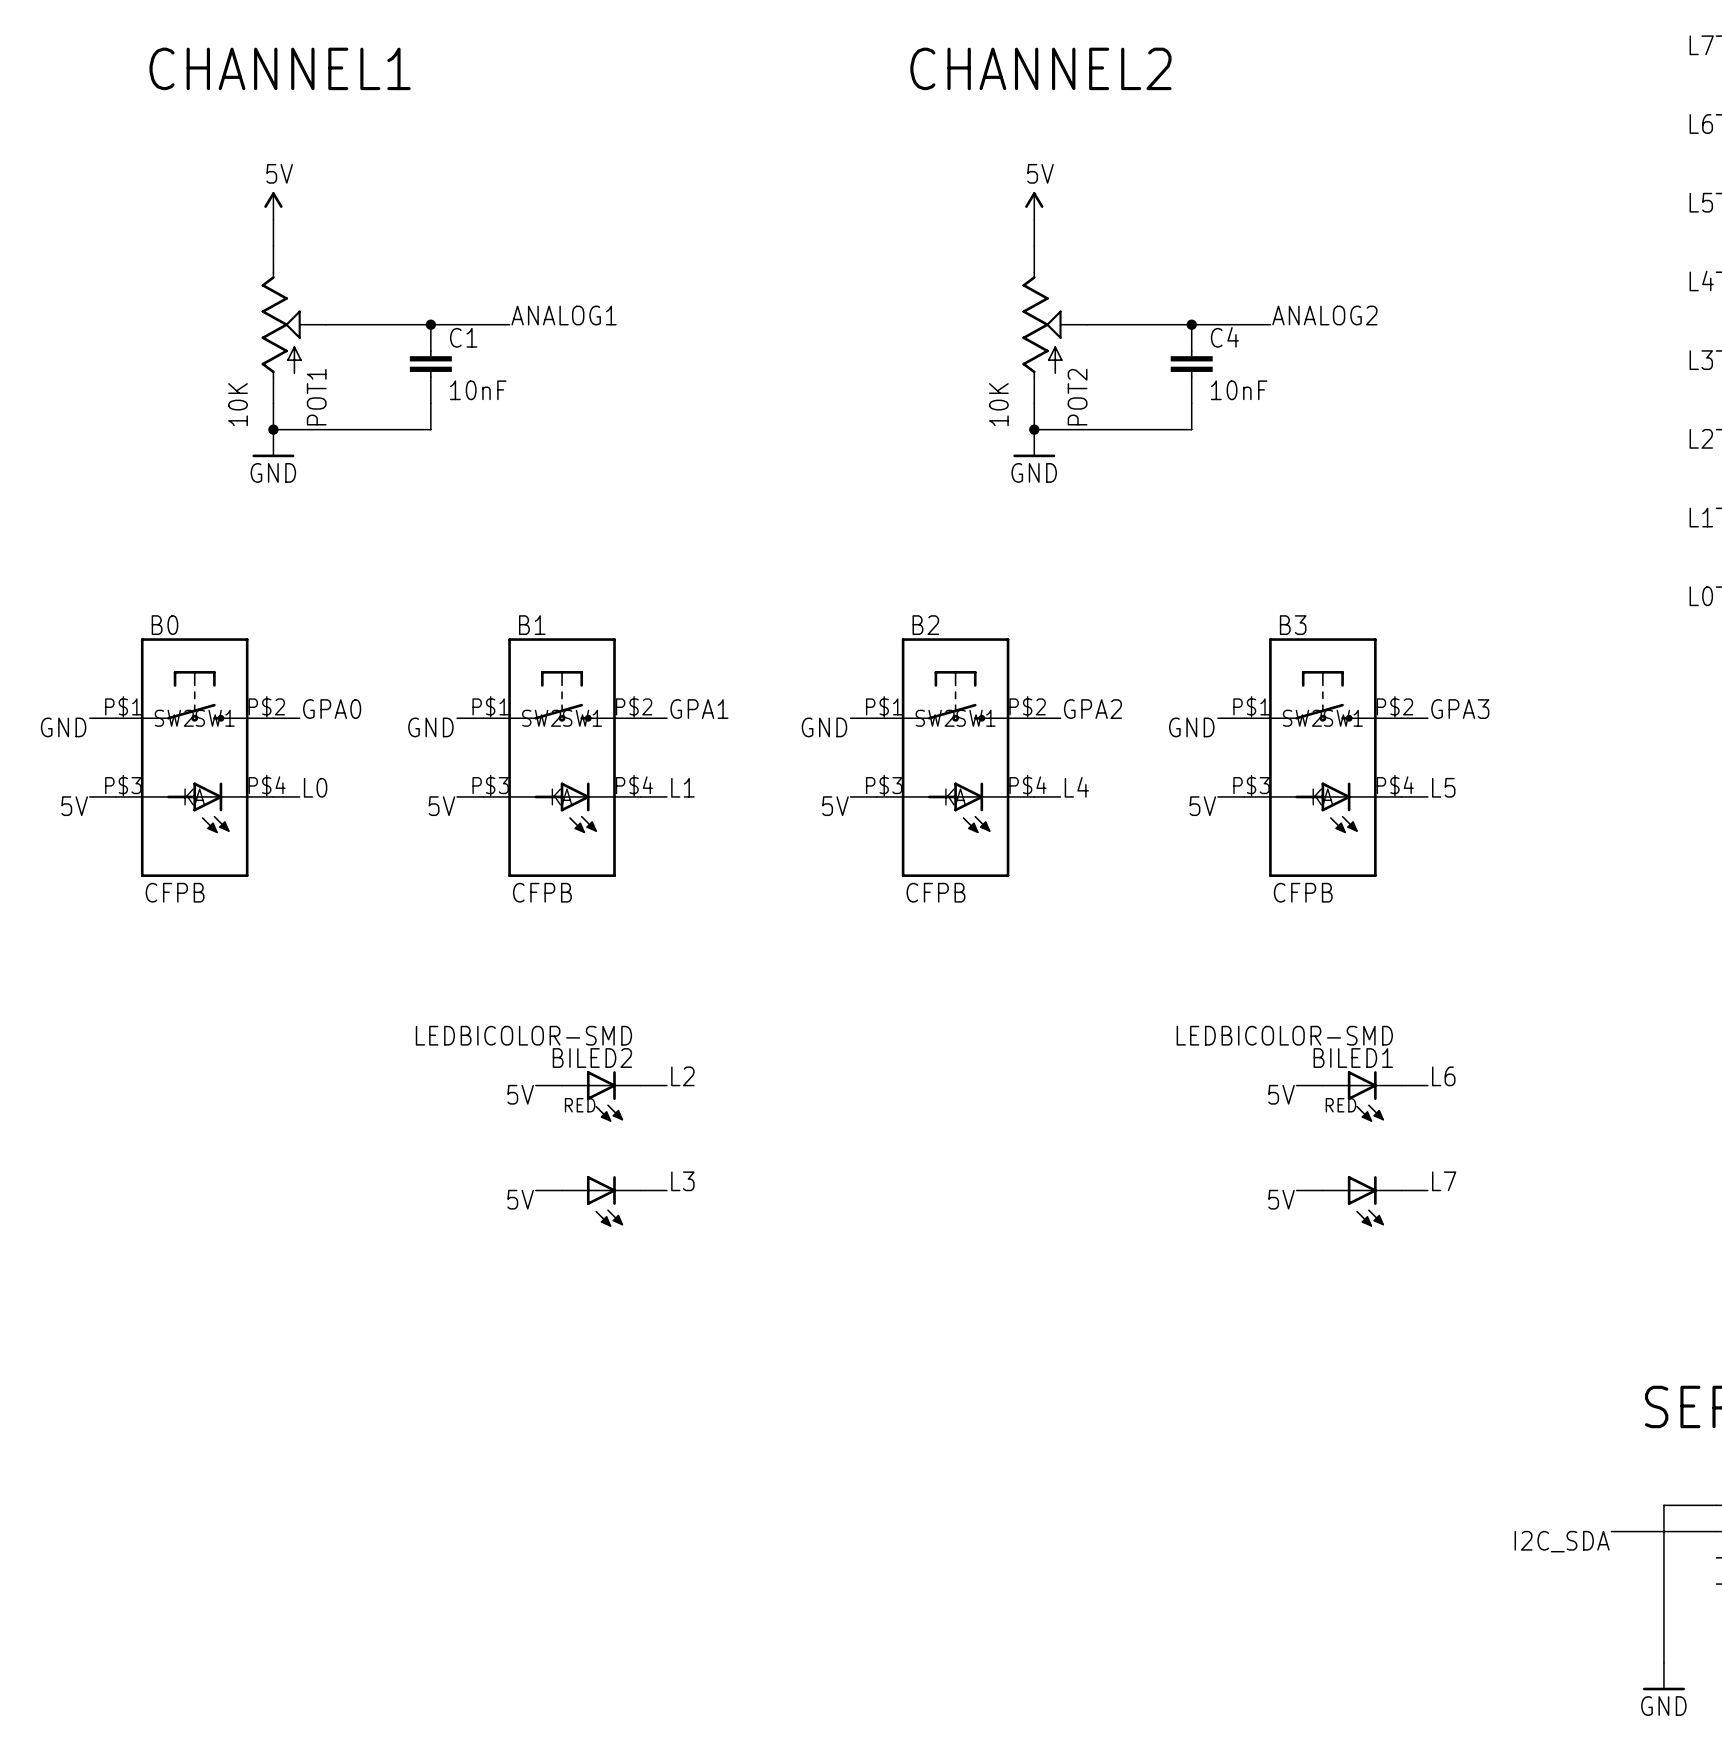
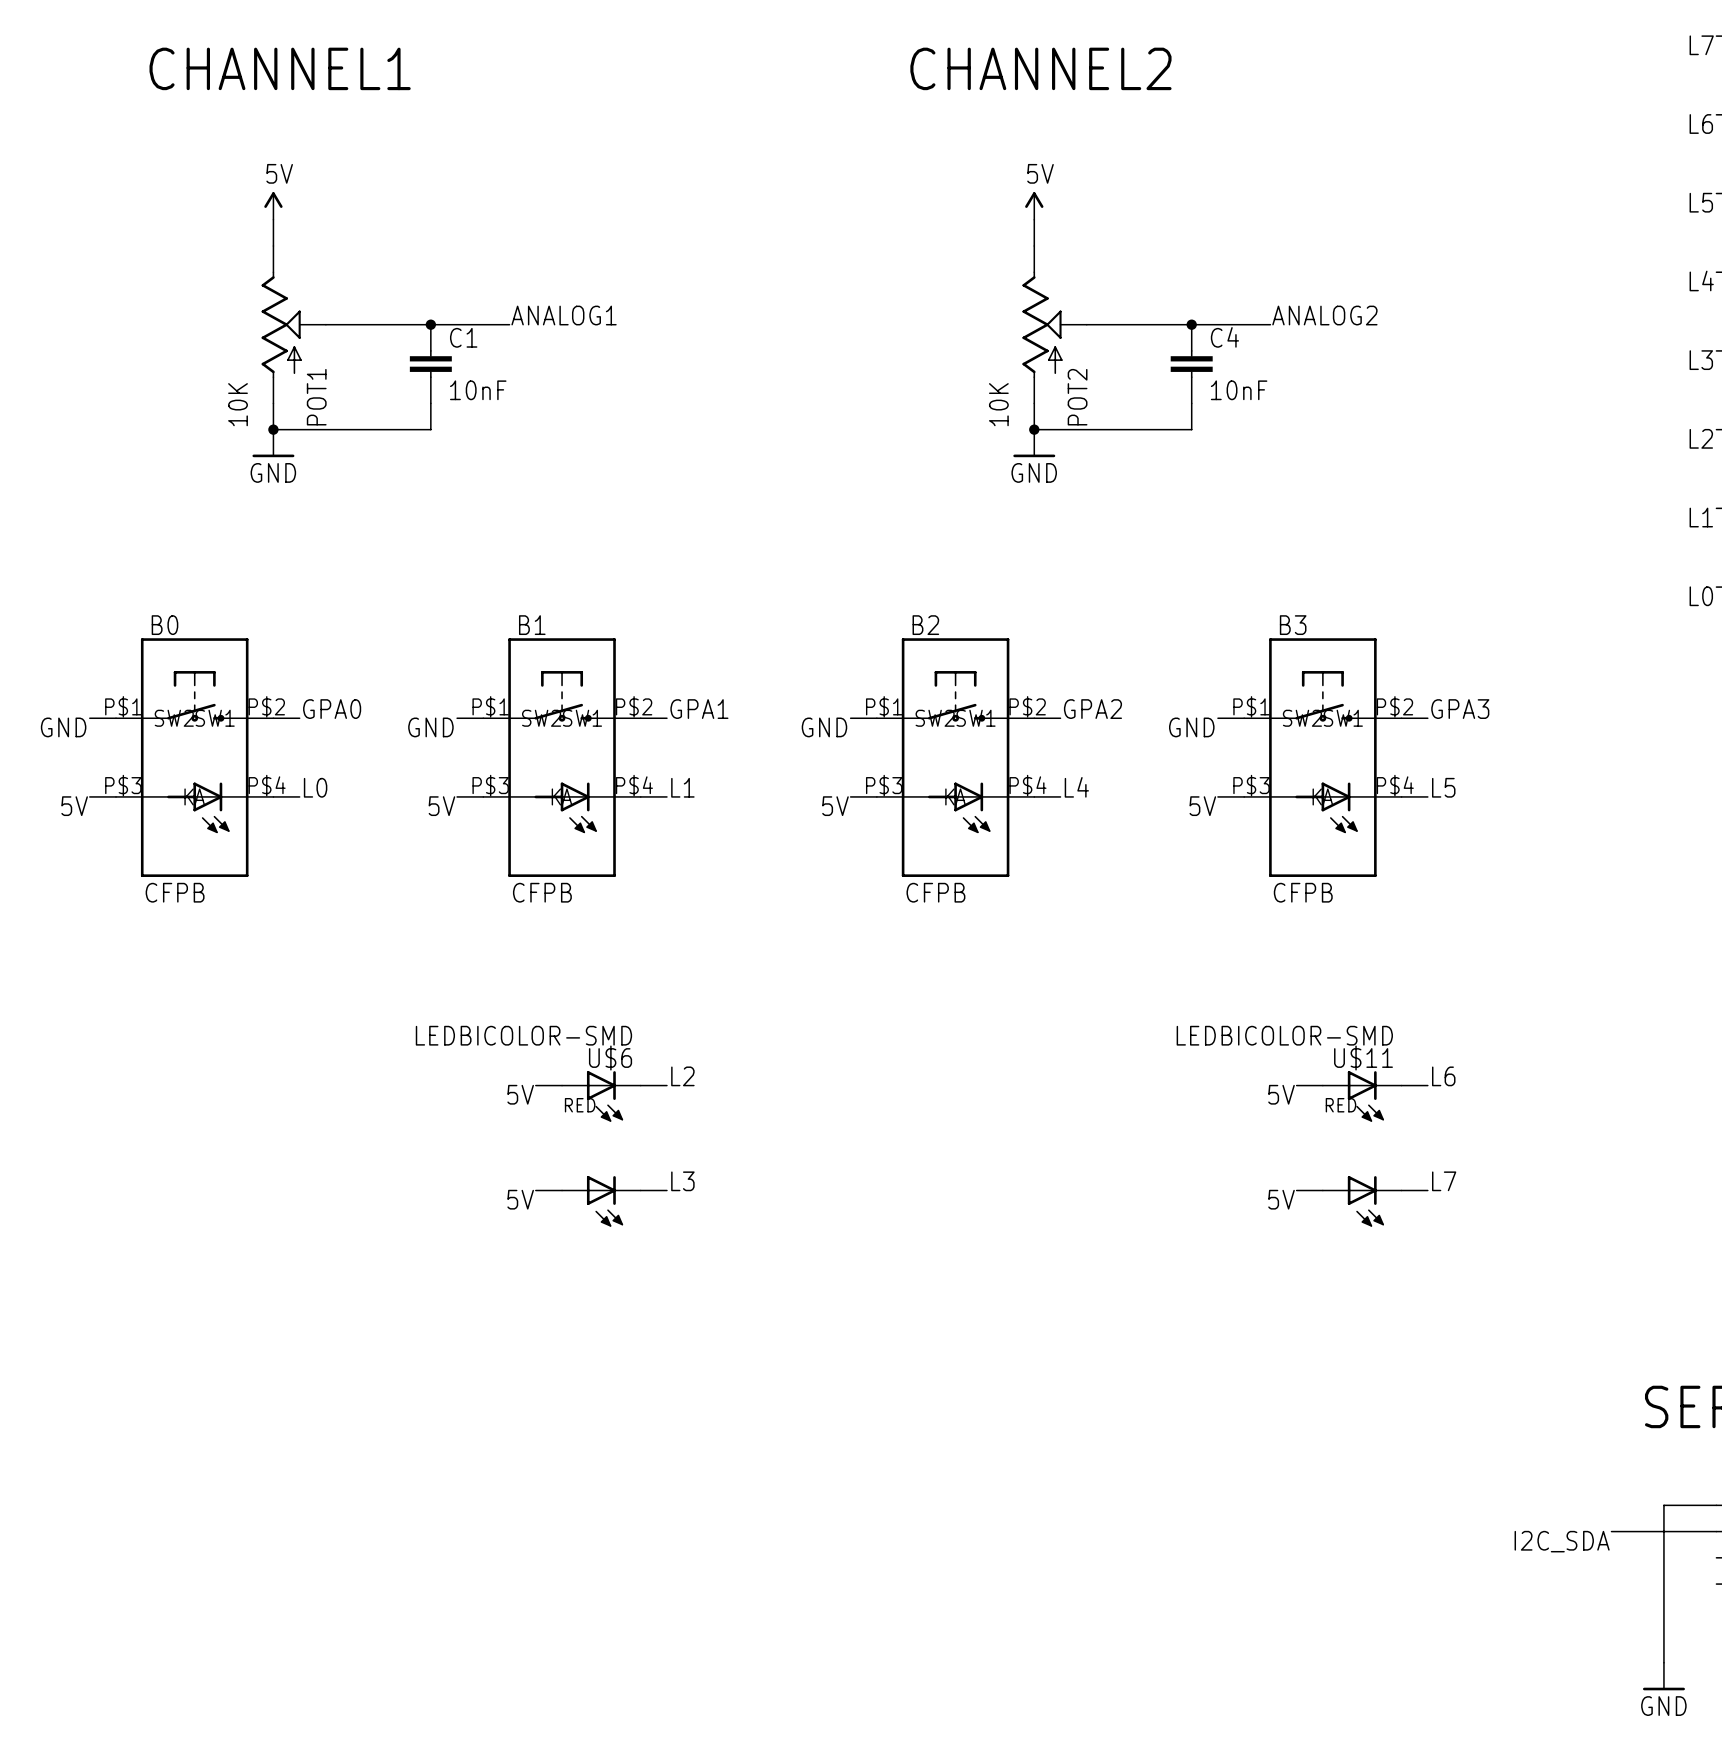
BILED2 name: BILED2 (592, 1058) -> U$6 (610, 1058)
BILED1 name: BILED1 (1353, 1058) -> U$11 (1363, 1058)

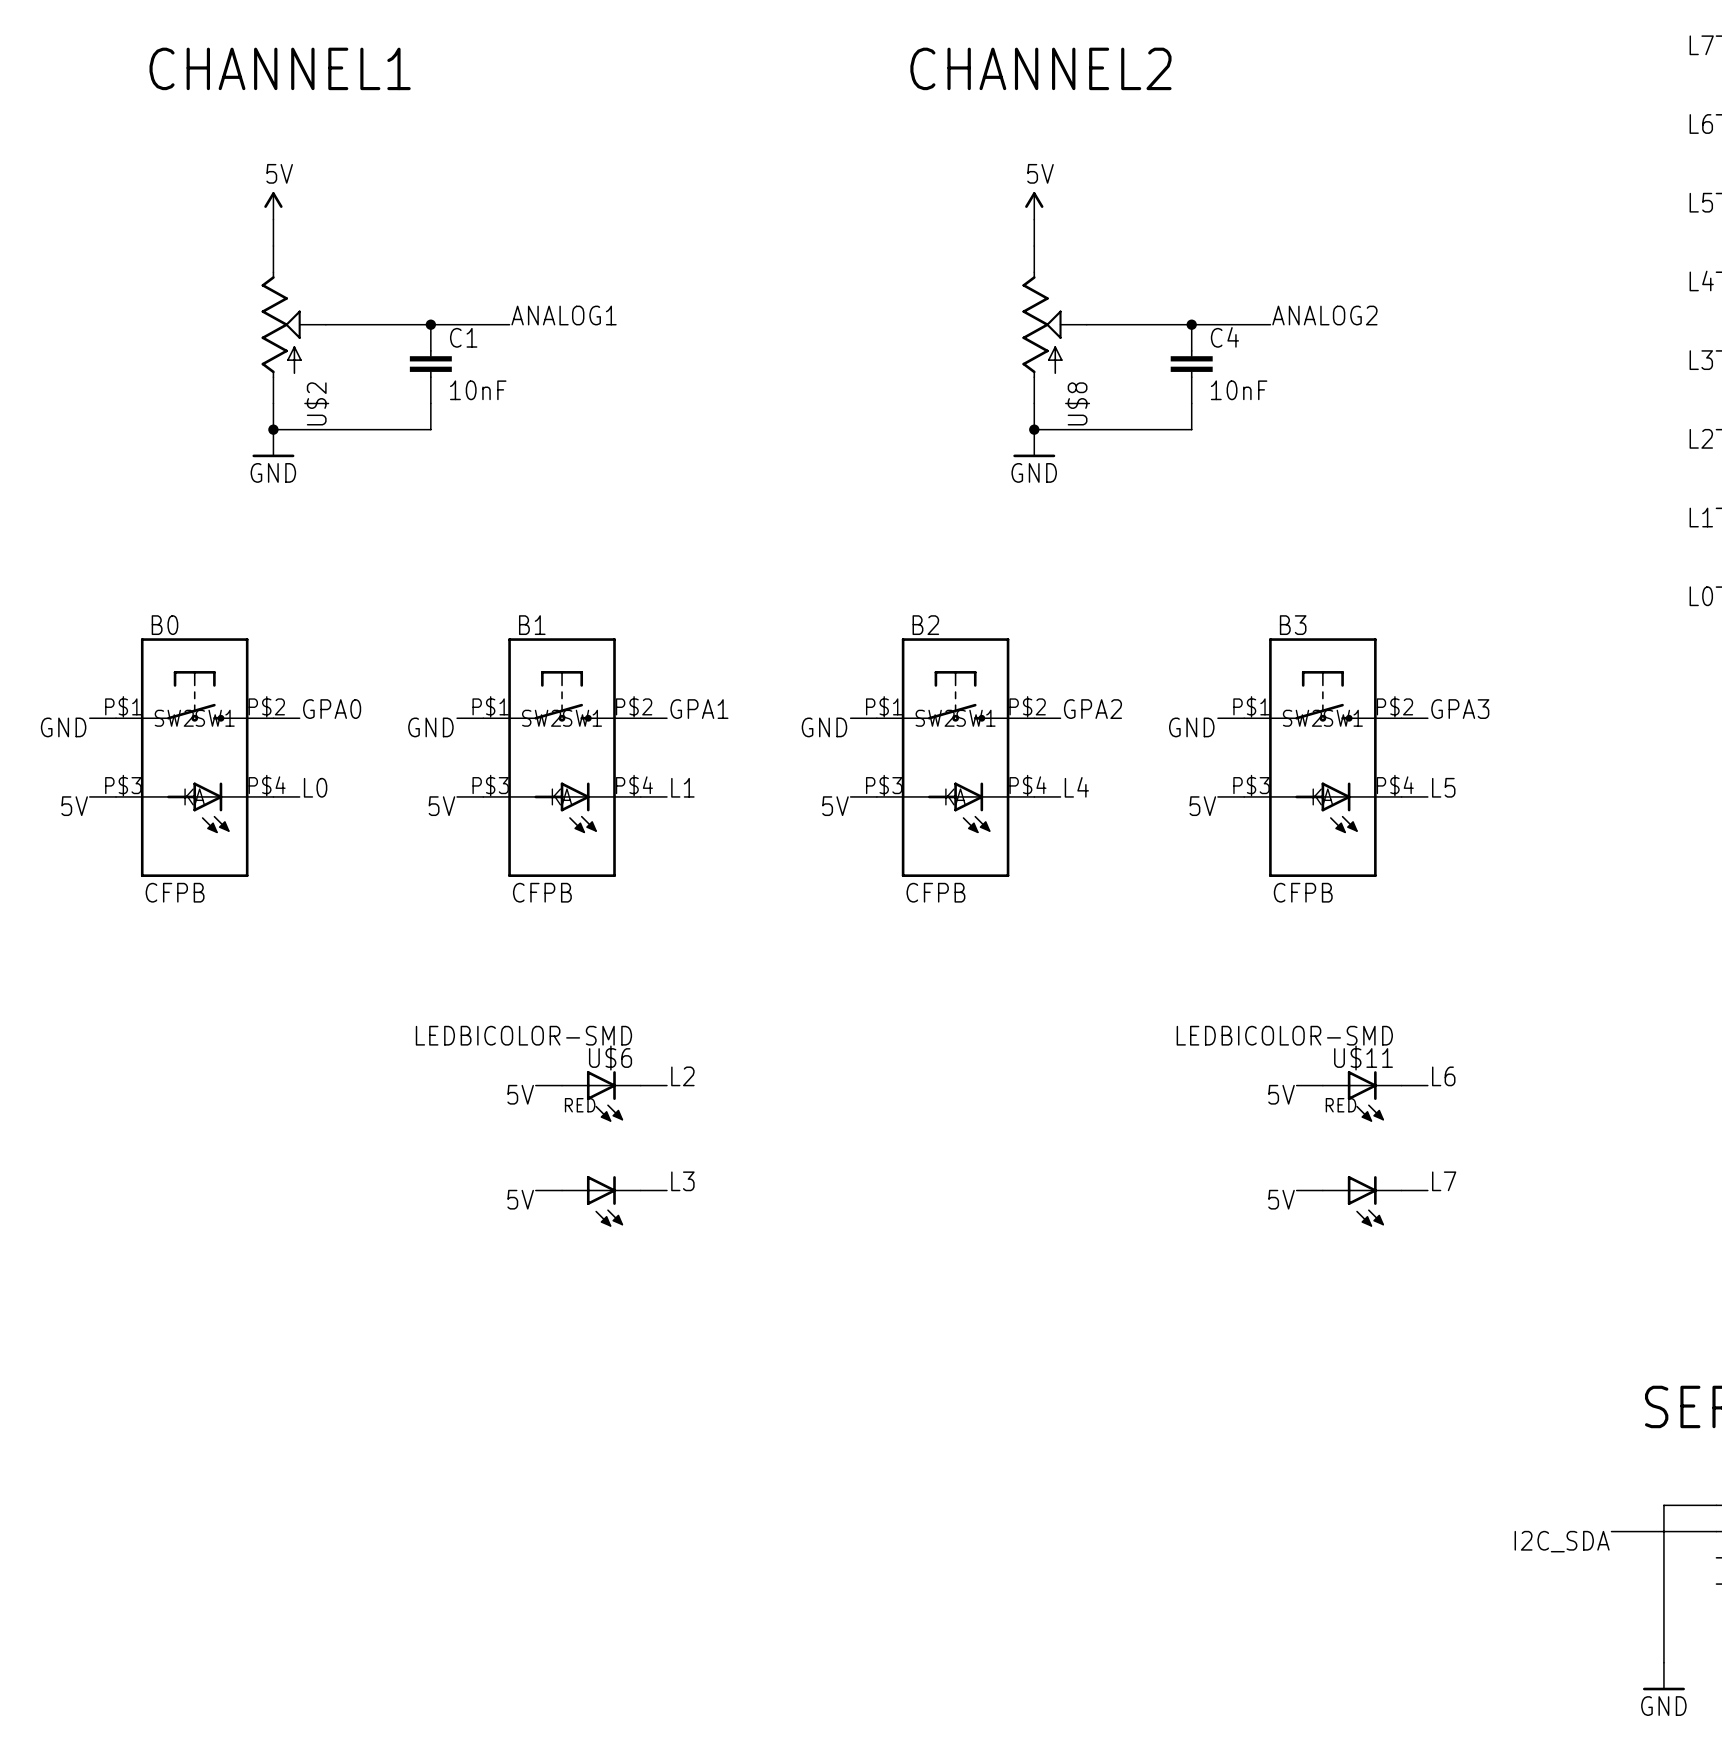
POT1 name: POT1 (316, 397) -> U$2 (316, 403)
POT2 name: POT2 (1077, 397) -> U$8 (1077, 403)
POT1 value: 10K (238, 404) -> none
POT2 value: 10K (998, 404) -> none

